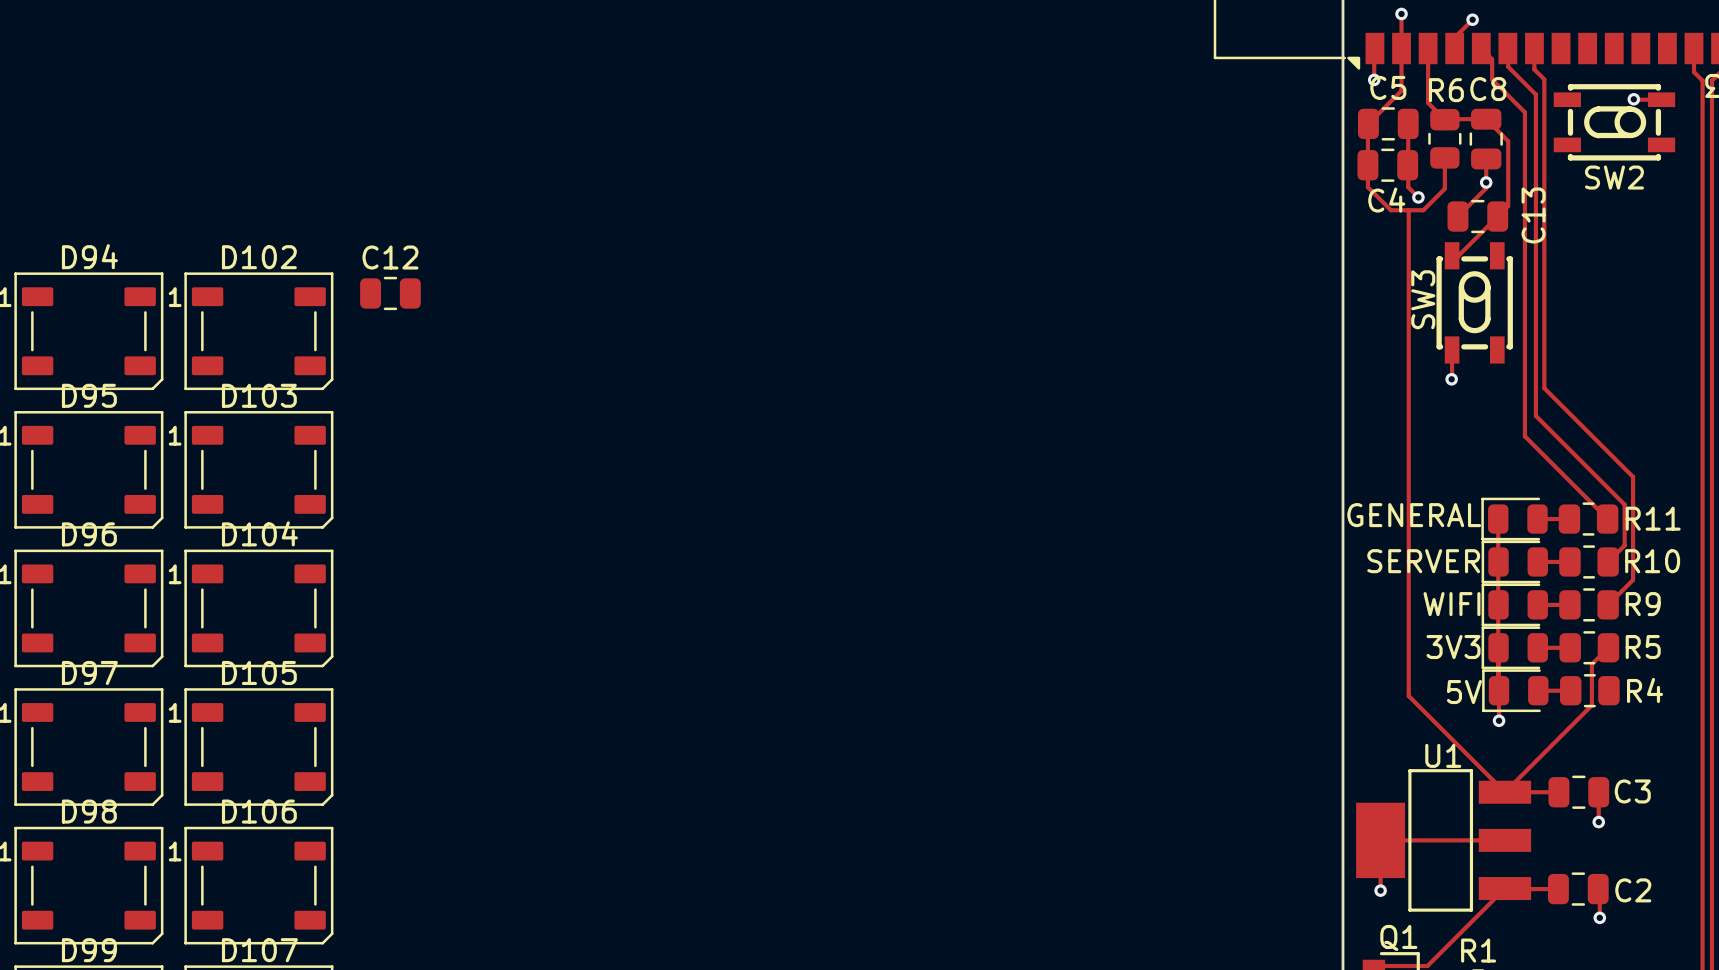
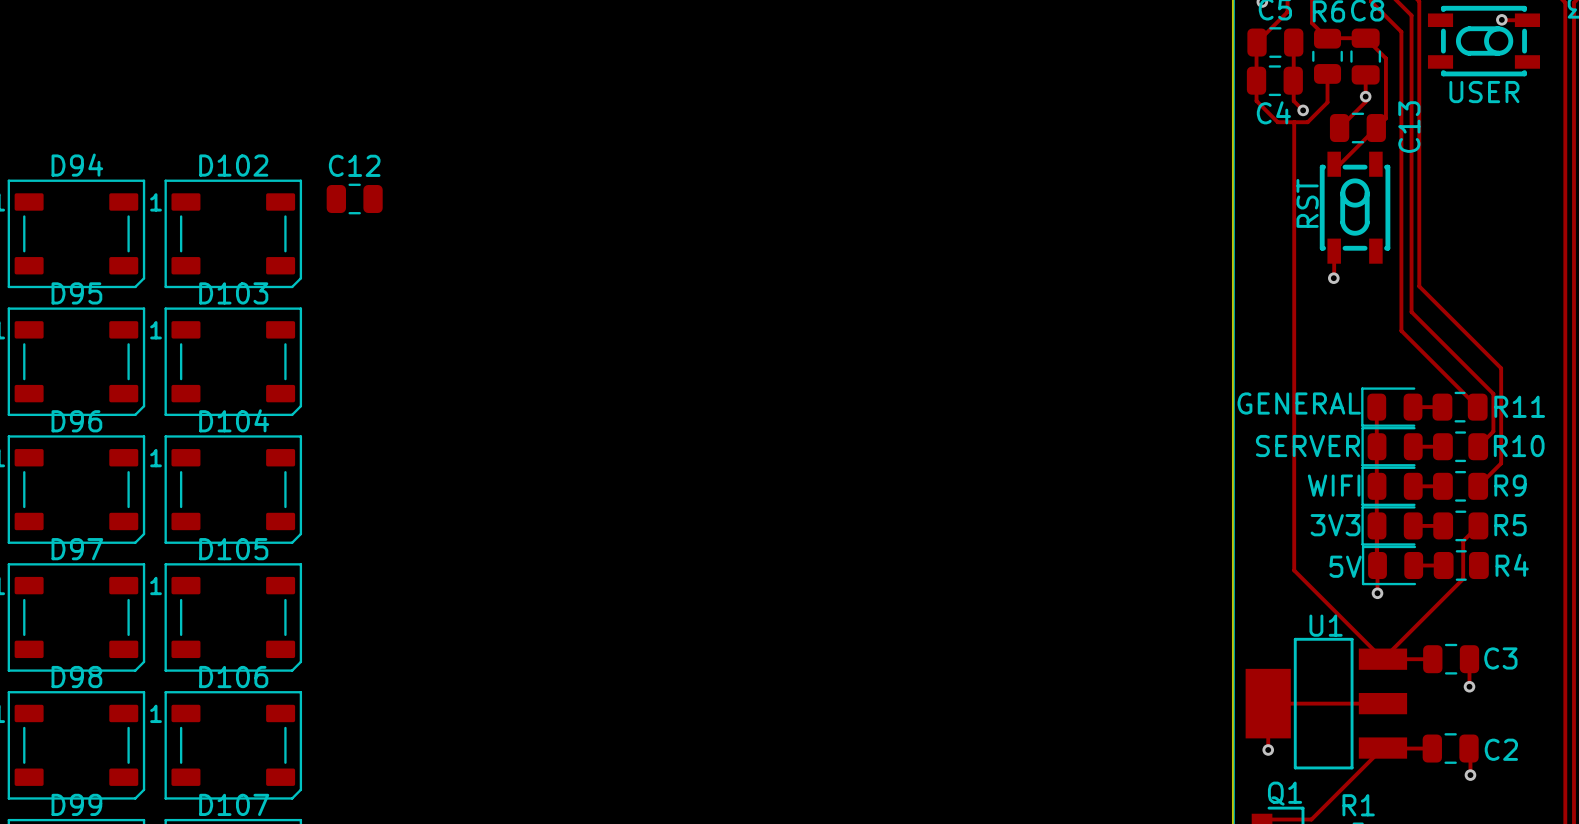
SW2 name: SW2 (1614, 177) -> USER (1484, 92)
SW3 name: SW3 (1423, 299) -> RST (1307, 203)

